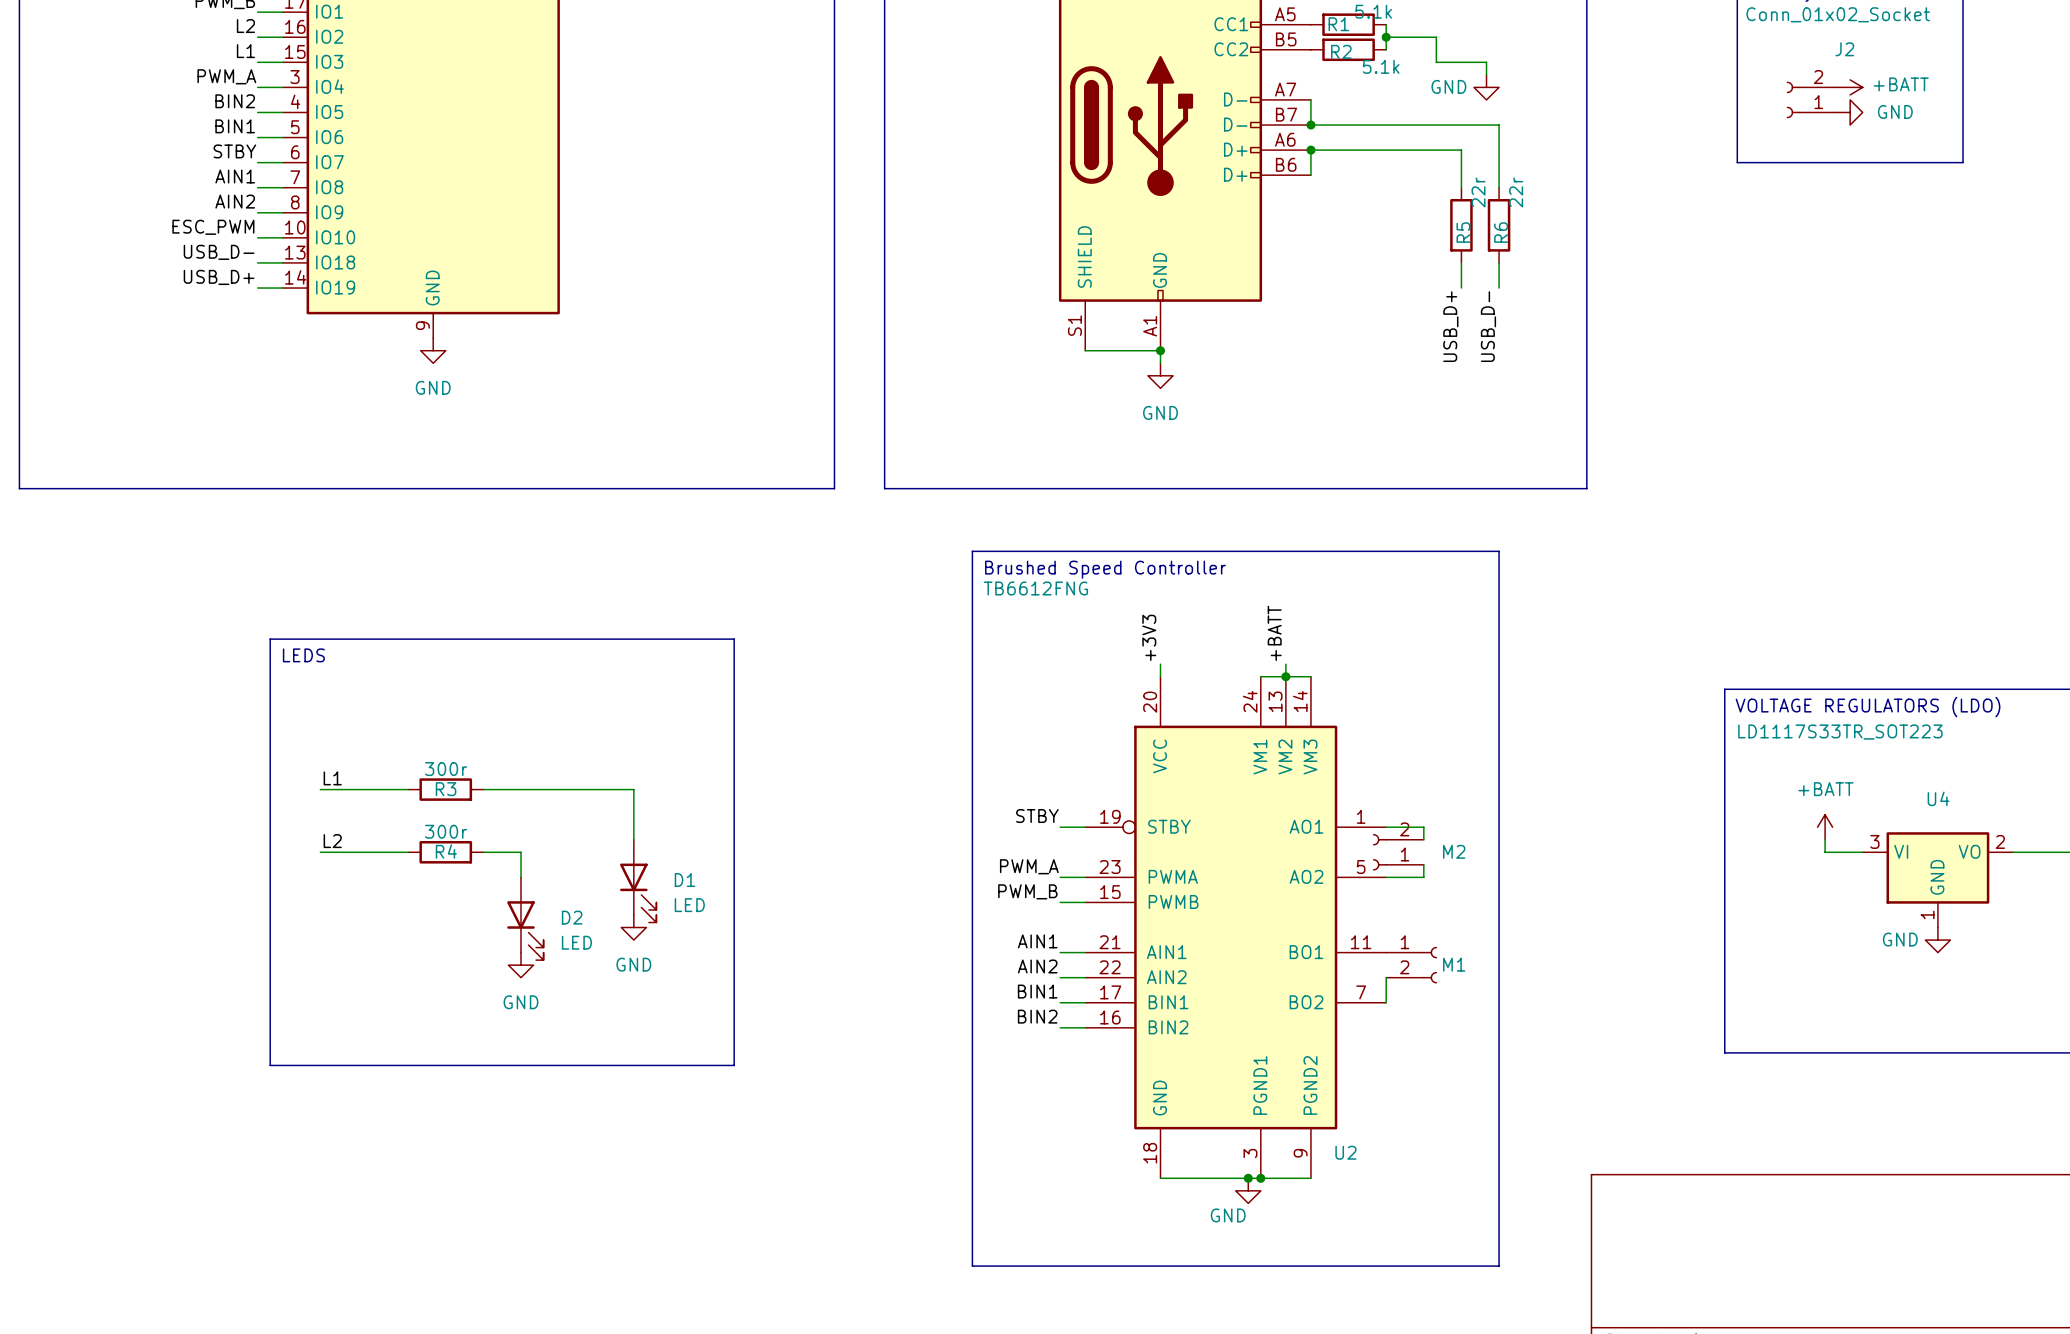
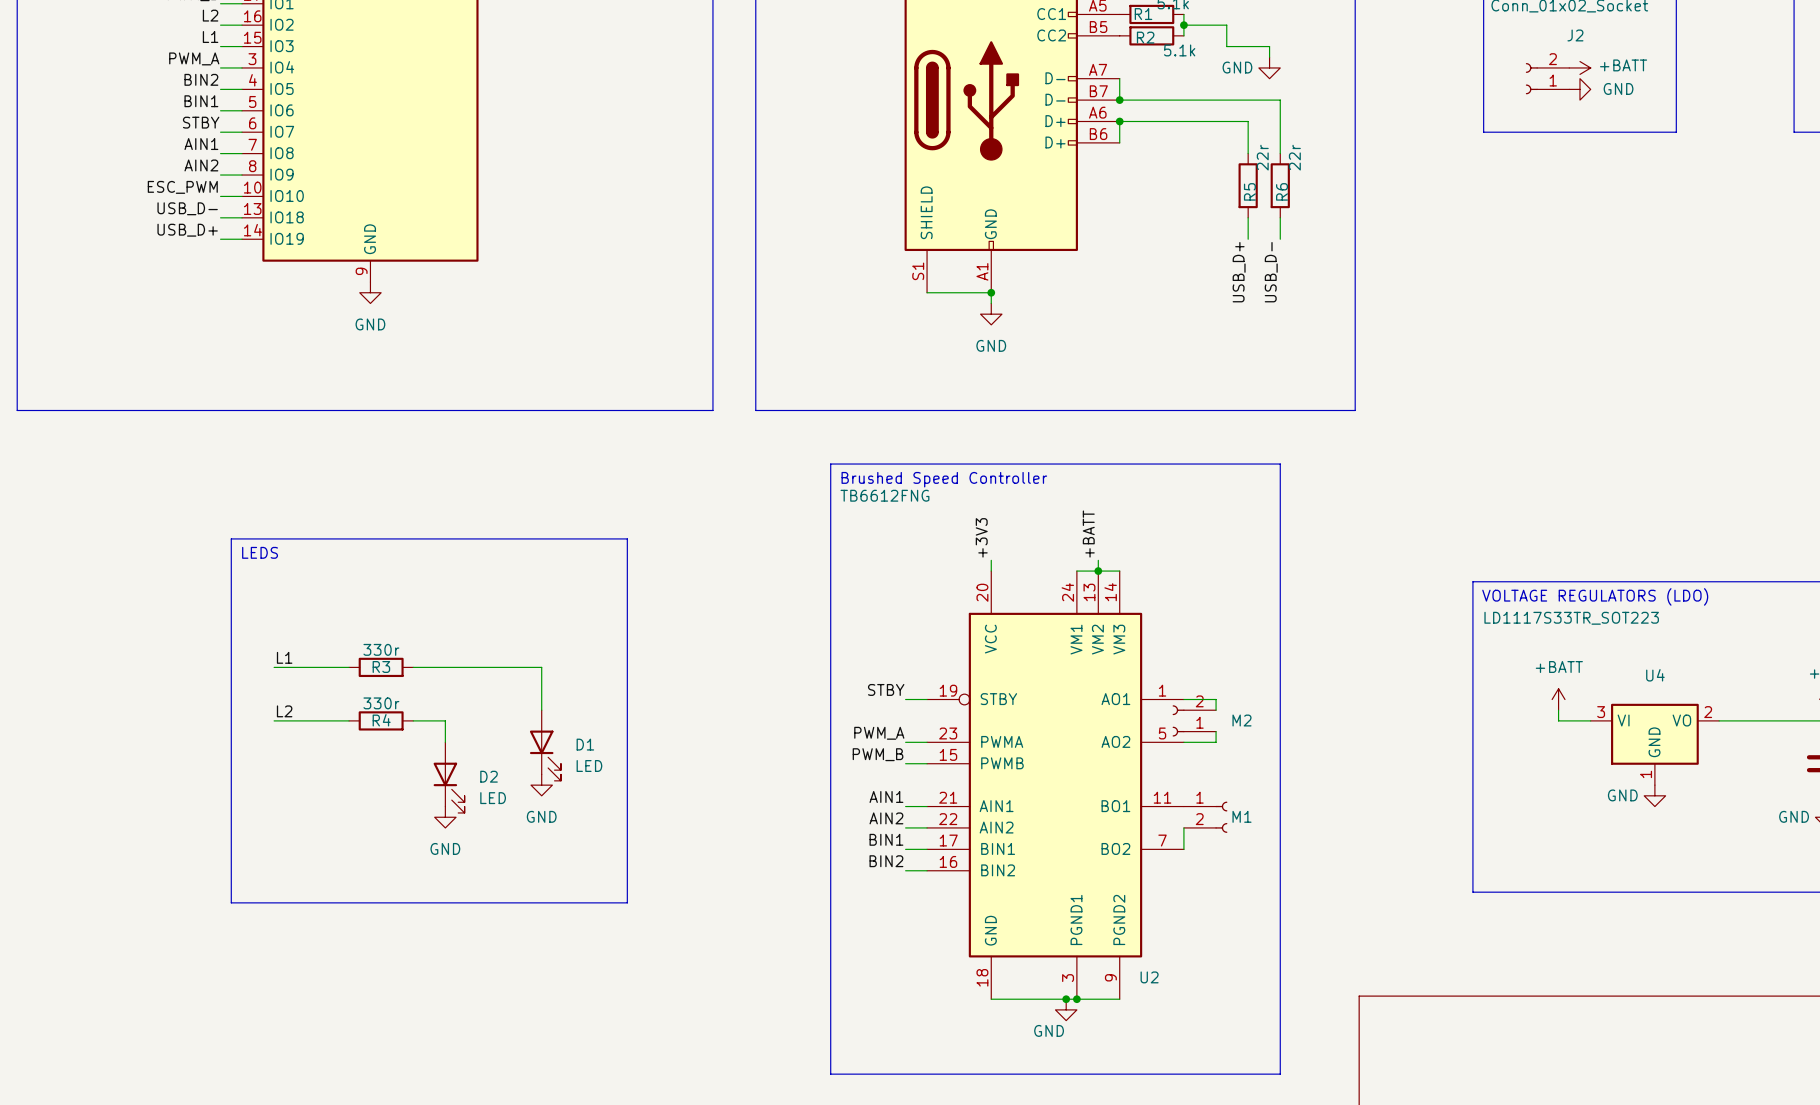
R3 value: 300r (446, 769) -> 330r (381, 649)
R4 value: 300r (446, 831) -> 330r (381, 703)

